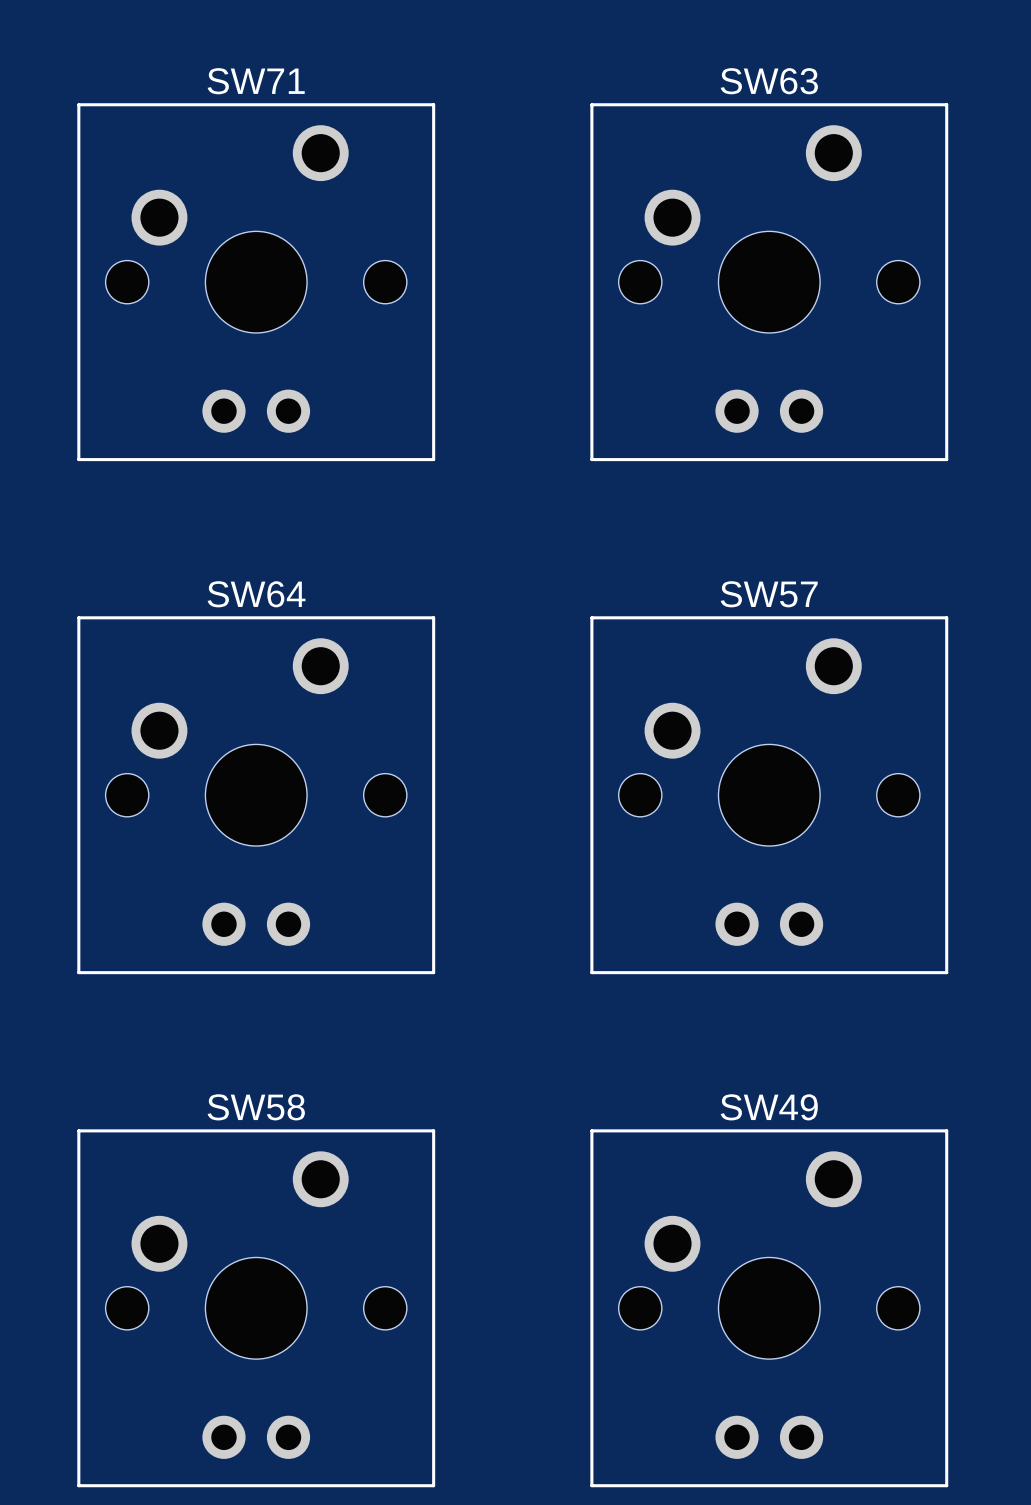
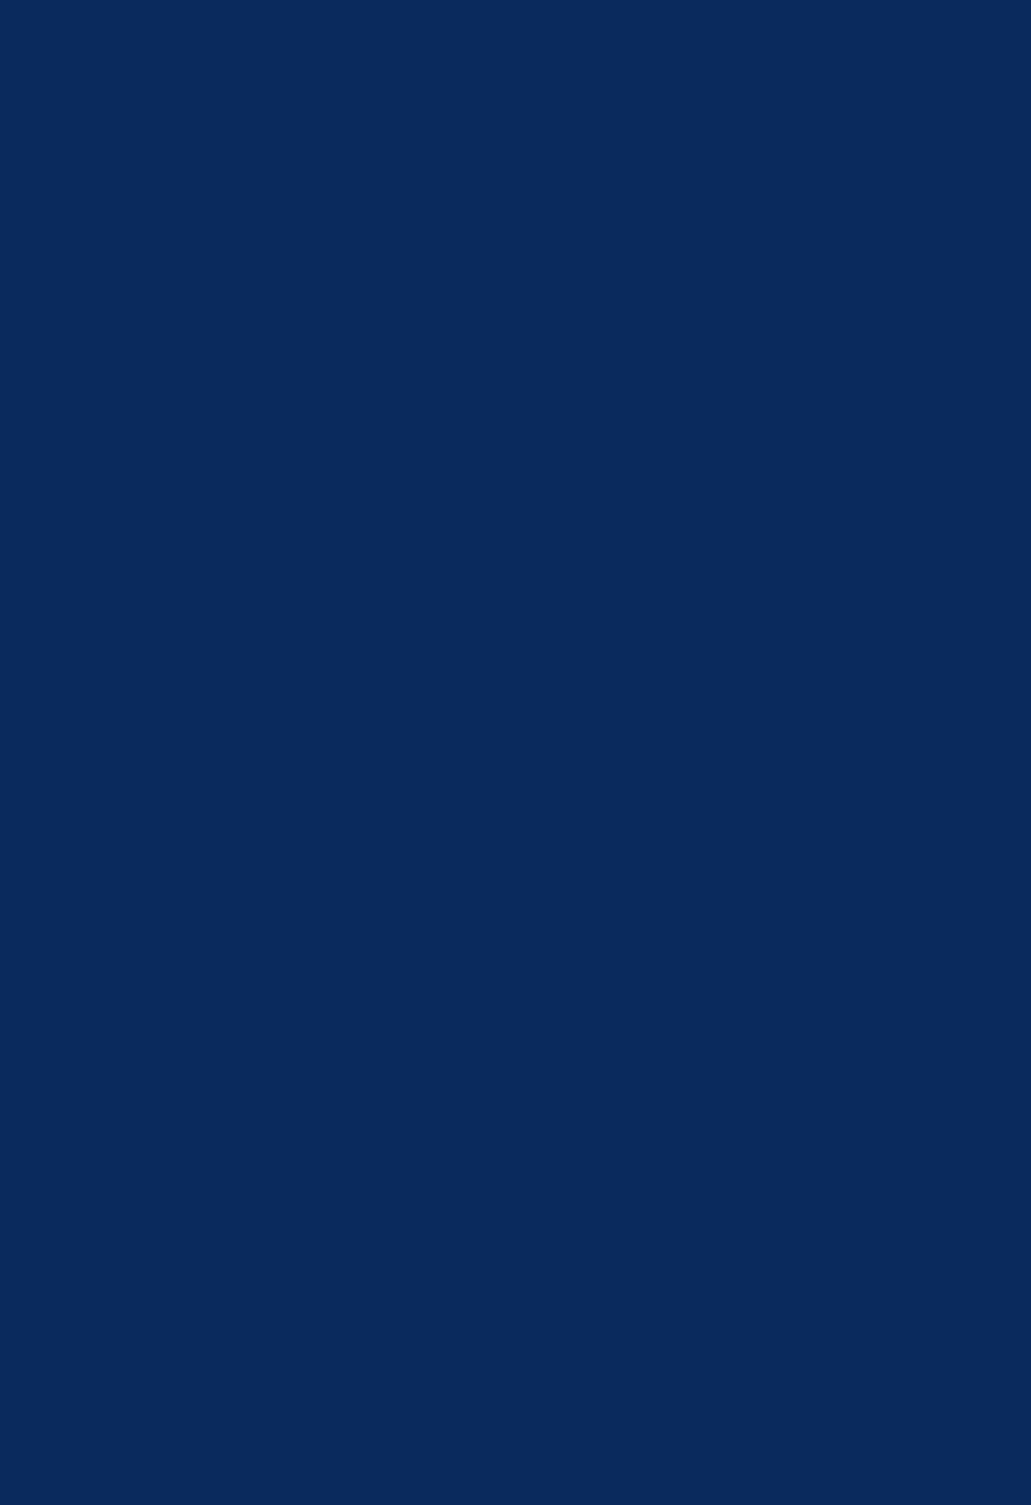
SW71: (256, 282) -> none
SW63: (769, 282) -> none
SW64: (256, 795) -> none
SW57: (769, 795) -> none
SW58: (256, 1308) -> none
SW49: (769, 1308) -> none

